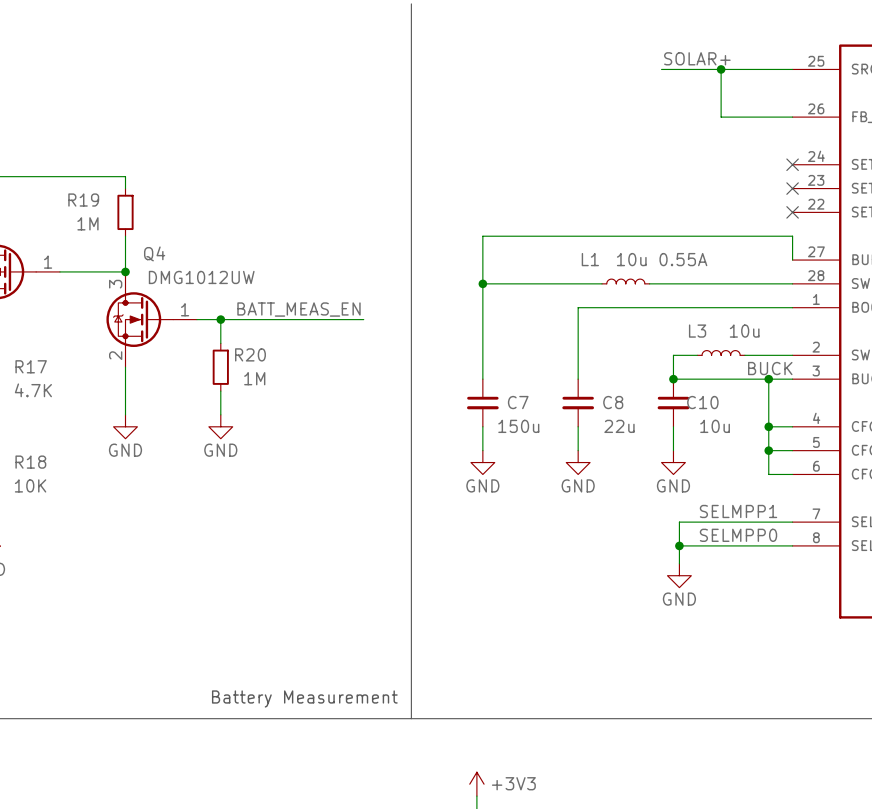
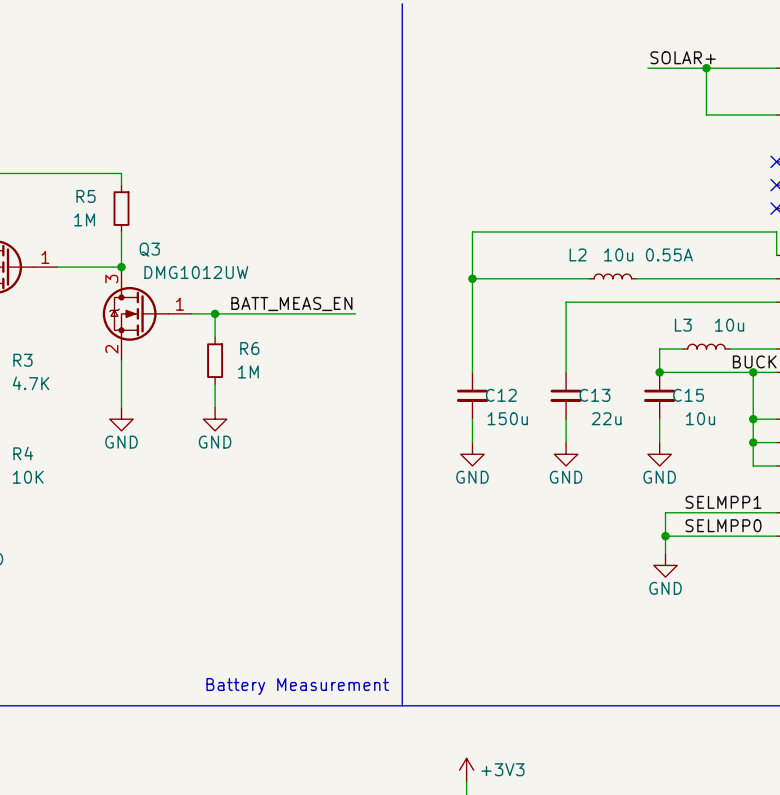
R19 name: R19 (83, 200) -> R5 (86, 196)
Q4 name: Q4 (154, 253) -> Q3 (149, 249)
L1 name: L1 (590, 259) -> L2 (578, 254)
R20 name: R20 (250, 354) -> R6 (249, 348)
R17 name: R17 (31, 366) -> R3 (22, 360)
C7 name: C7 (518, 402) -> C12 (501, 395)
C8 name: C8 (613, 402) -> C13 (594, 395)
C10 name: C10 (702, 402) -> C15 (688, 395)
R18 name: R18 (30, 462) -> R4 (23, 453)

